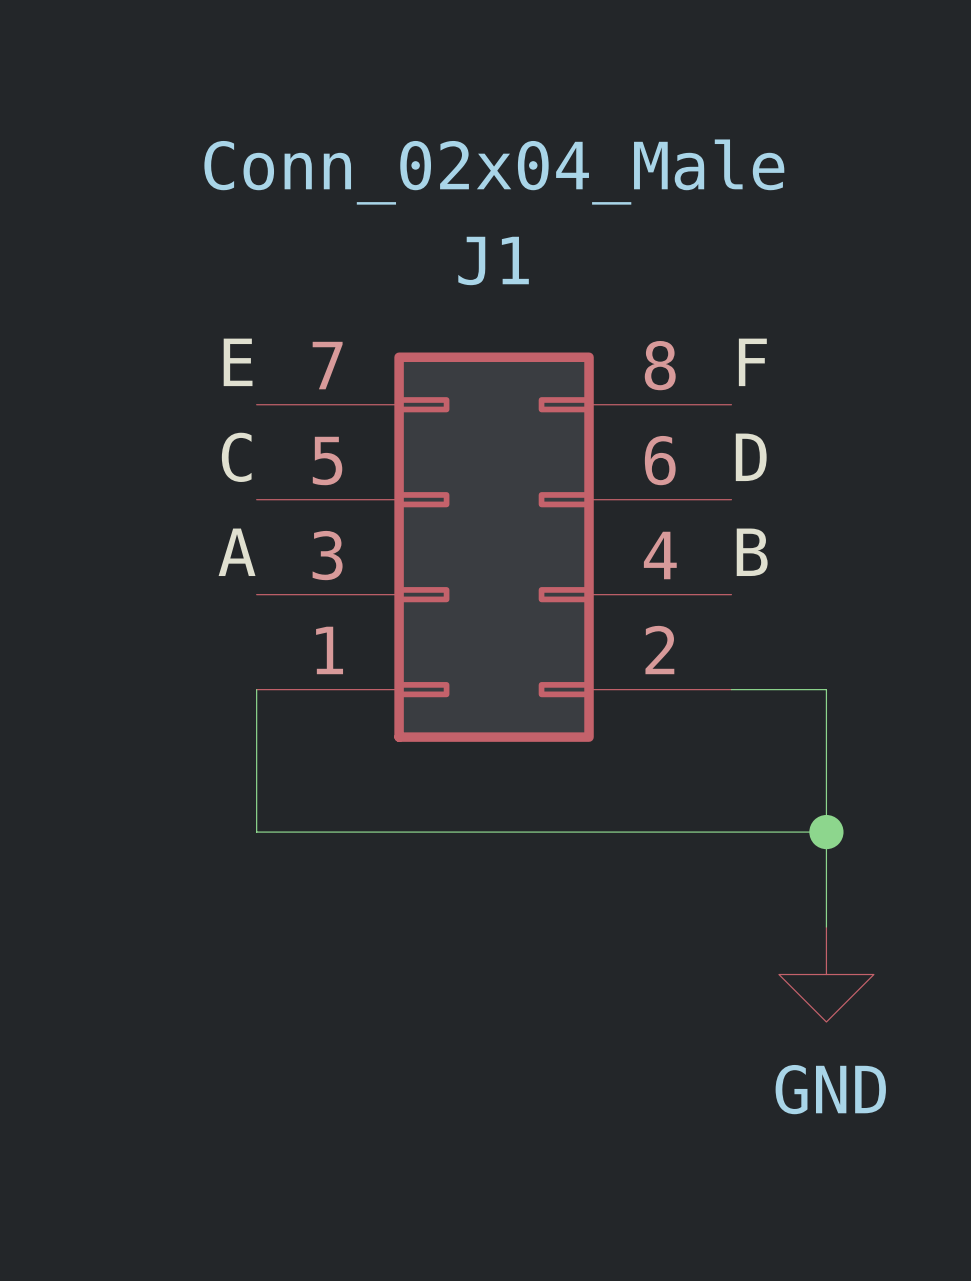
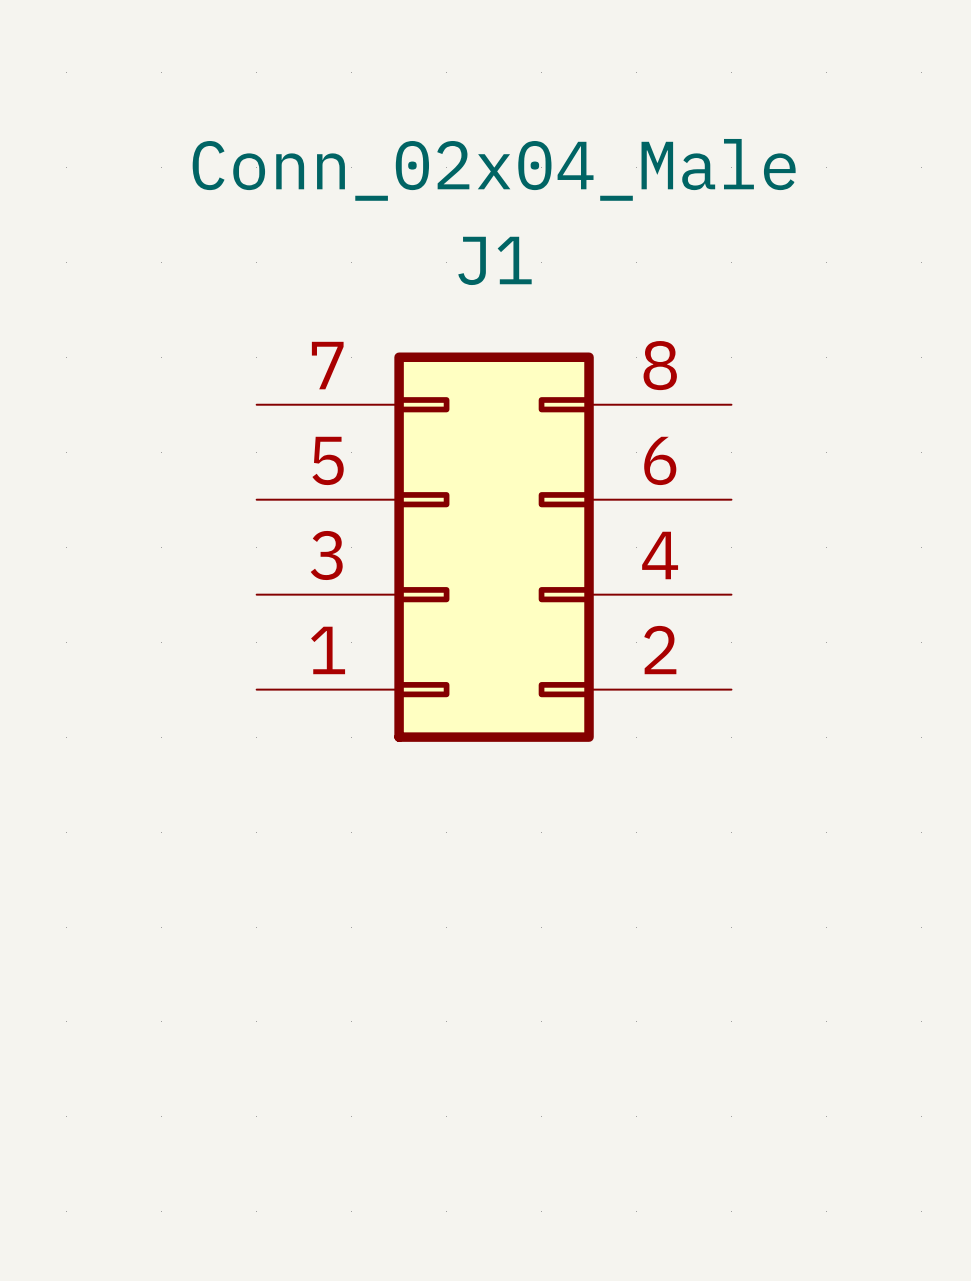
label: E (238, 362) -> none
label: F (752, 362) -> none
label: C (236, 457) -> none
label: D (751, 457) -> none
label: A (237, 552) -> none
label: B (752, 552) -> none
wire: (256, 689) (256, 832) (826, 832) -> none
wire: (731, 689) (826, 689) (826, 927) -> none
junction: (826, 832) -> none
power symbol: GND (826, 974) -> none

